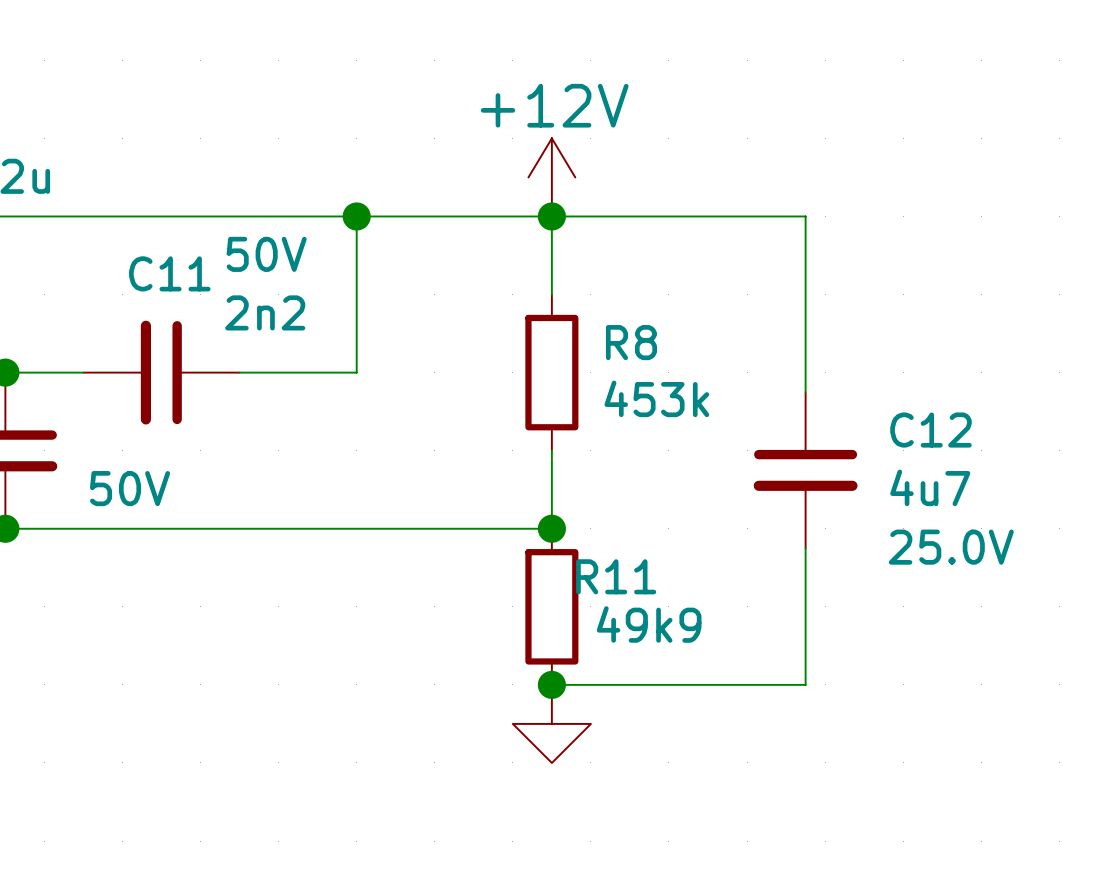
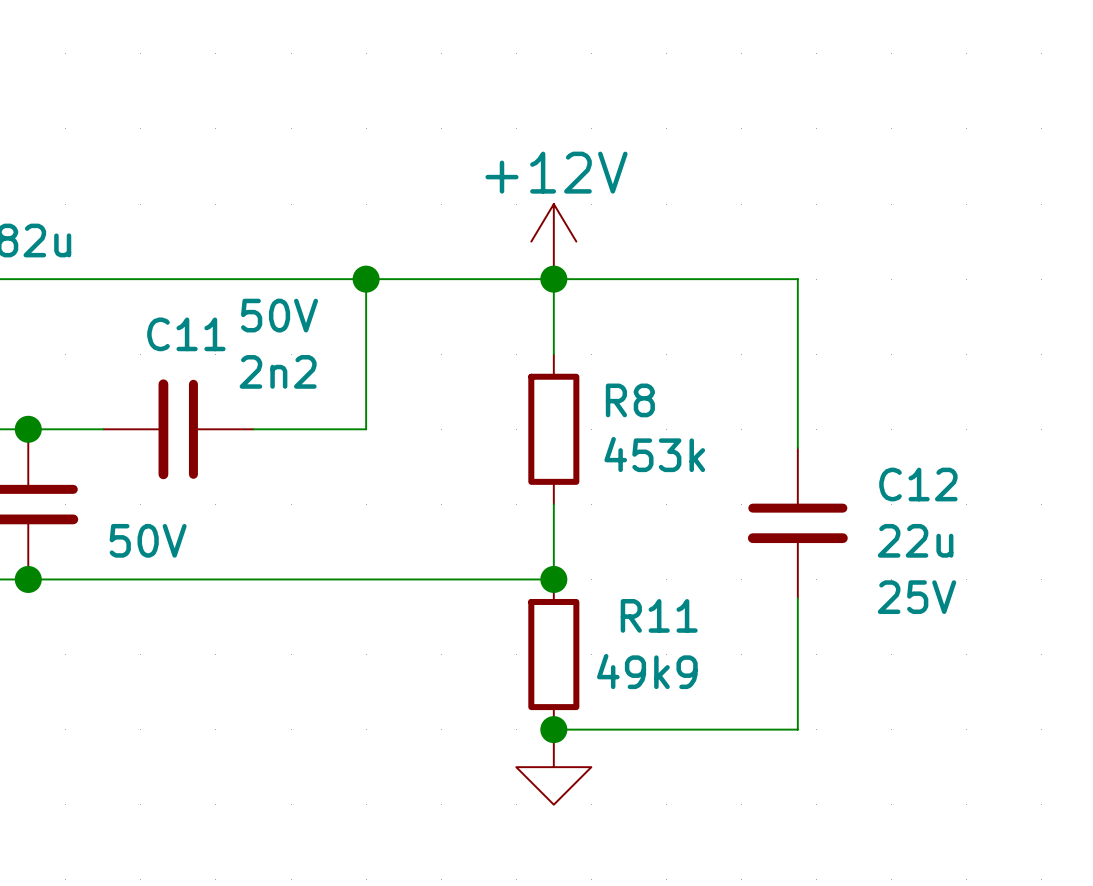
C12 value: 4u7 (930, 487) -> 22u (915, 540)
C12 text: 25.0V (951, 547) -> 25V (917, 597)
R11 name position: R11 (616, 576) -> R11 (659, 615)

